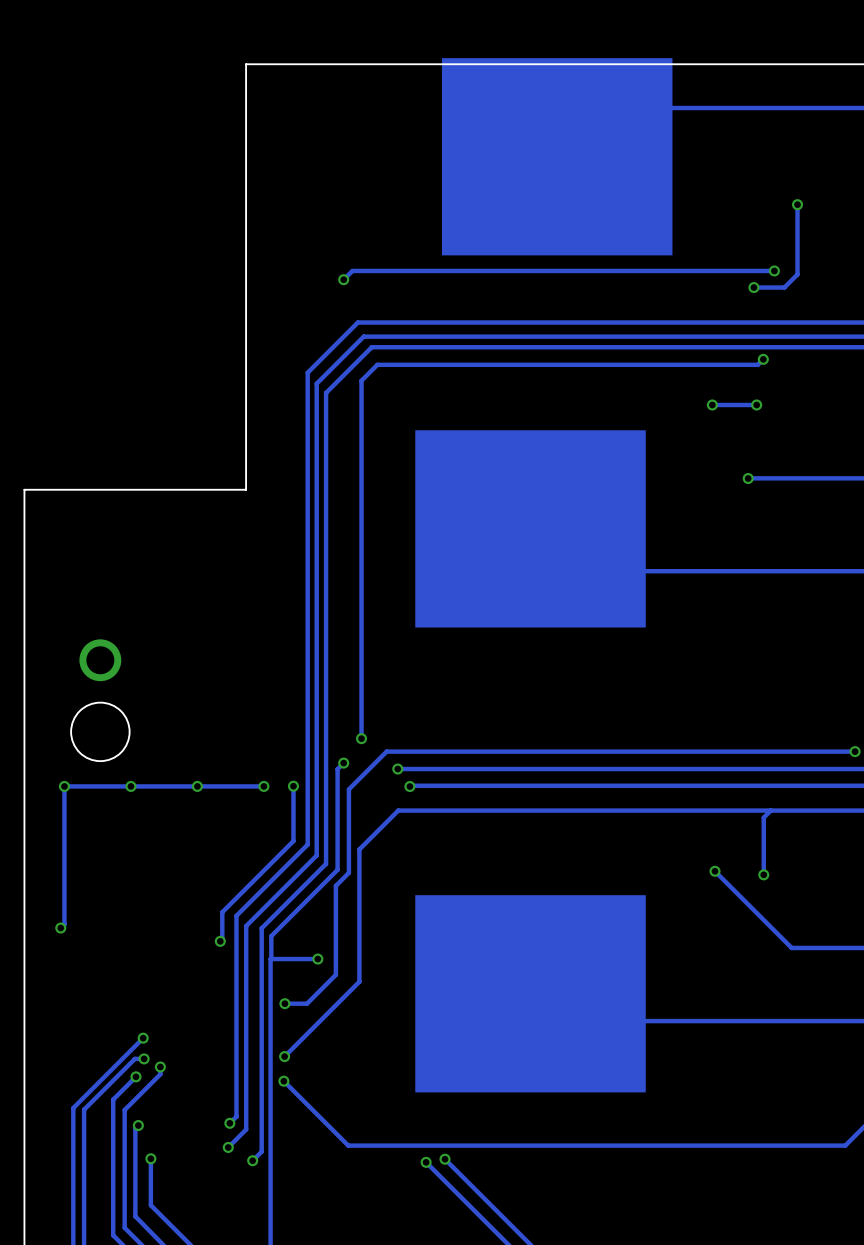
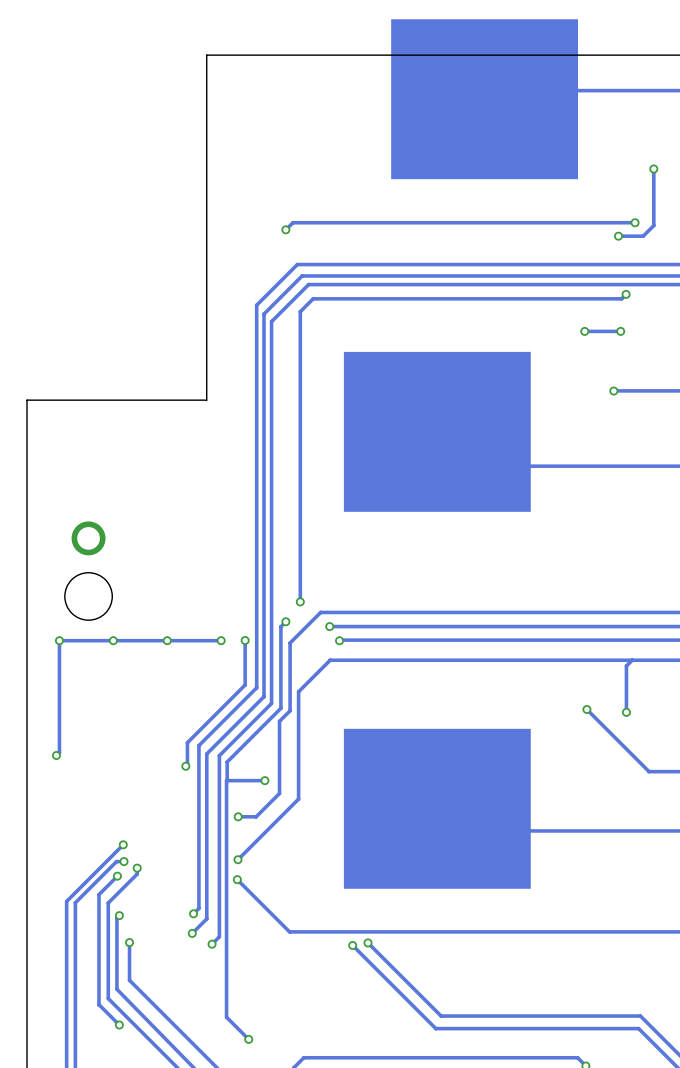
part position: (557, 156) -> (484, 99)

